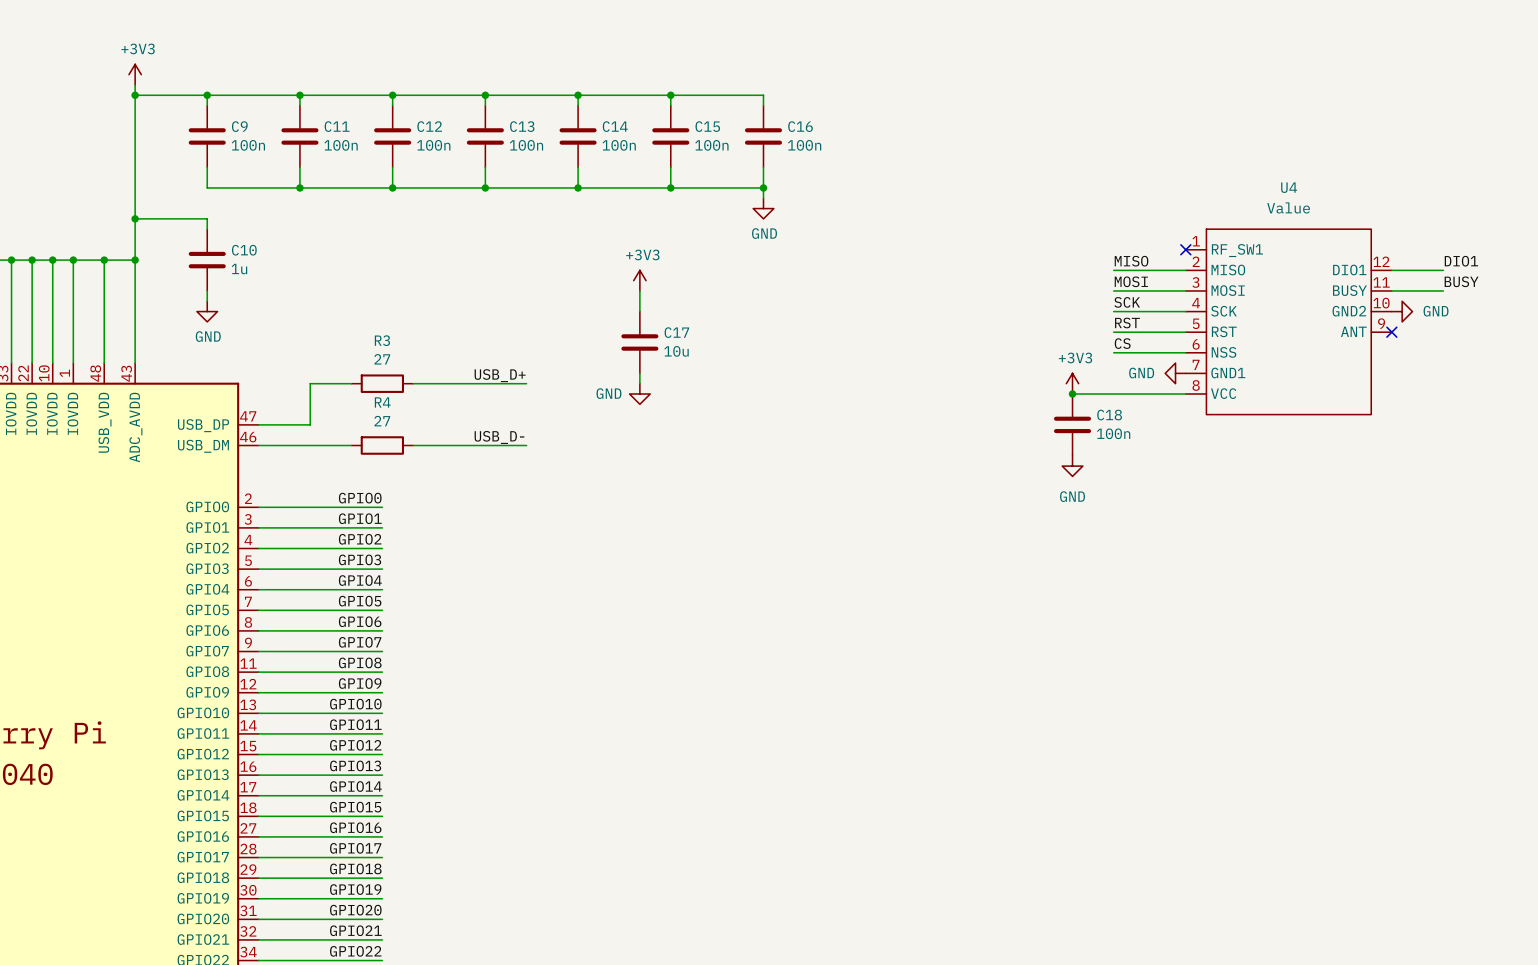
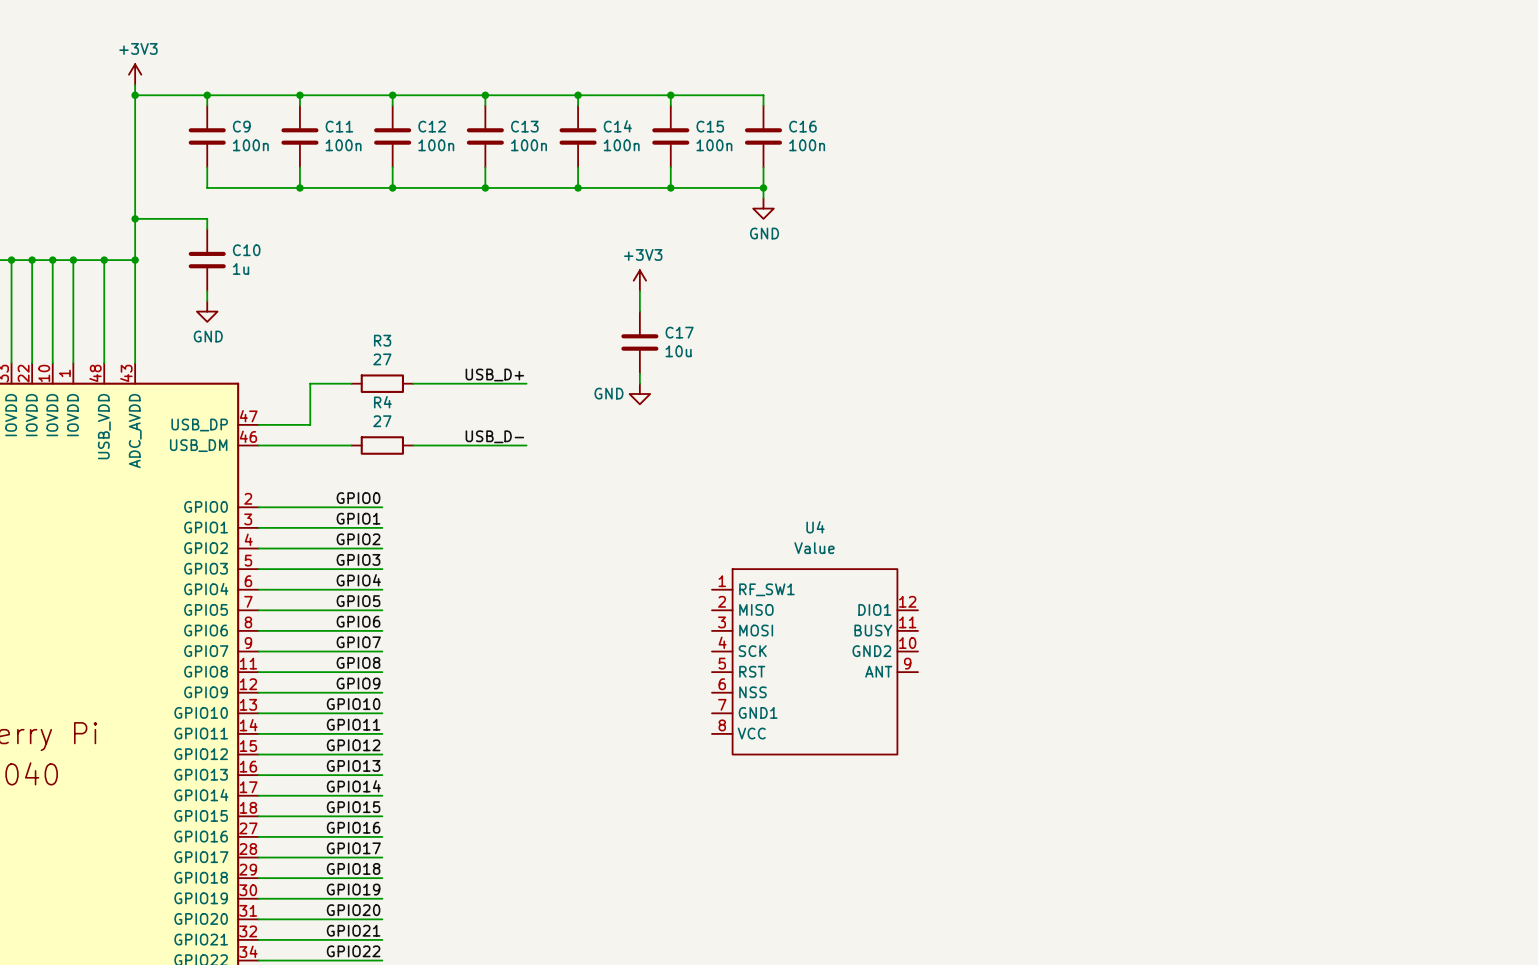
no-connect mark: (1185, 249) -> none
label: MISO (1131, 261) -> none
label: DIO1 (1461, 261) -> none
wire: (1113, 270) (1185, 270) -> none
wire: (1391, 270) (1443, 270) -> none
label: MOSI (1131, 281) -> none
label: BUSY (1461, 281) -> none
wire: (1113, 290) (1185, 290) -> none
wire: (1391, 290) (1443, 290) -> none
label: SCK (1127, 302) -> none
wire: (1113, 311) (1185, 311) -> none
power symbol: GND (1402, 311) -> none
U4 position: (1288, 321) -> (814, 661)
label: RST (1127, 323) -> none
wire: (1113, 332) (1185, 332) -> none
no-connect mark: (1391, 332) -> none
label: CS (1122, 343) -> none
wire: (1113, 352) (1185, 352) -> none
power symbol: GND (1175, 373) -> none
power symbol: +3V3 (1072, 383) -> none
wire: (1072, 394) (1185, 394) -> none
junction: (1072, 394) -> none
C18: 100n (1072, 424) -> none
power symbol: GND (1072, 466) -> none

